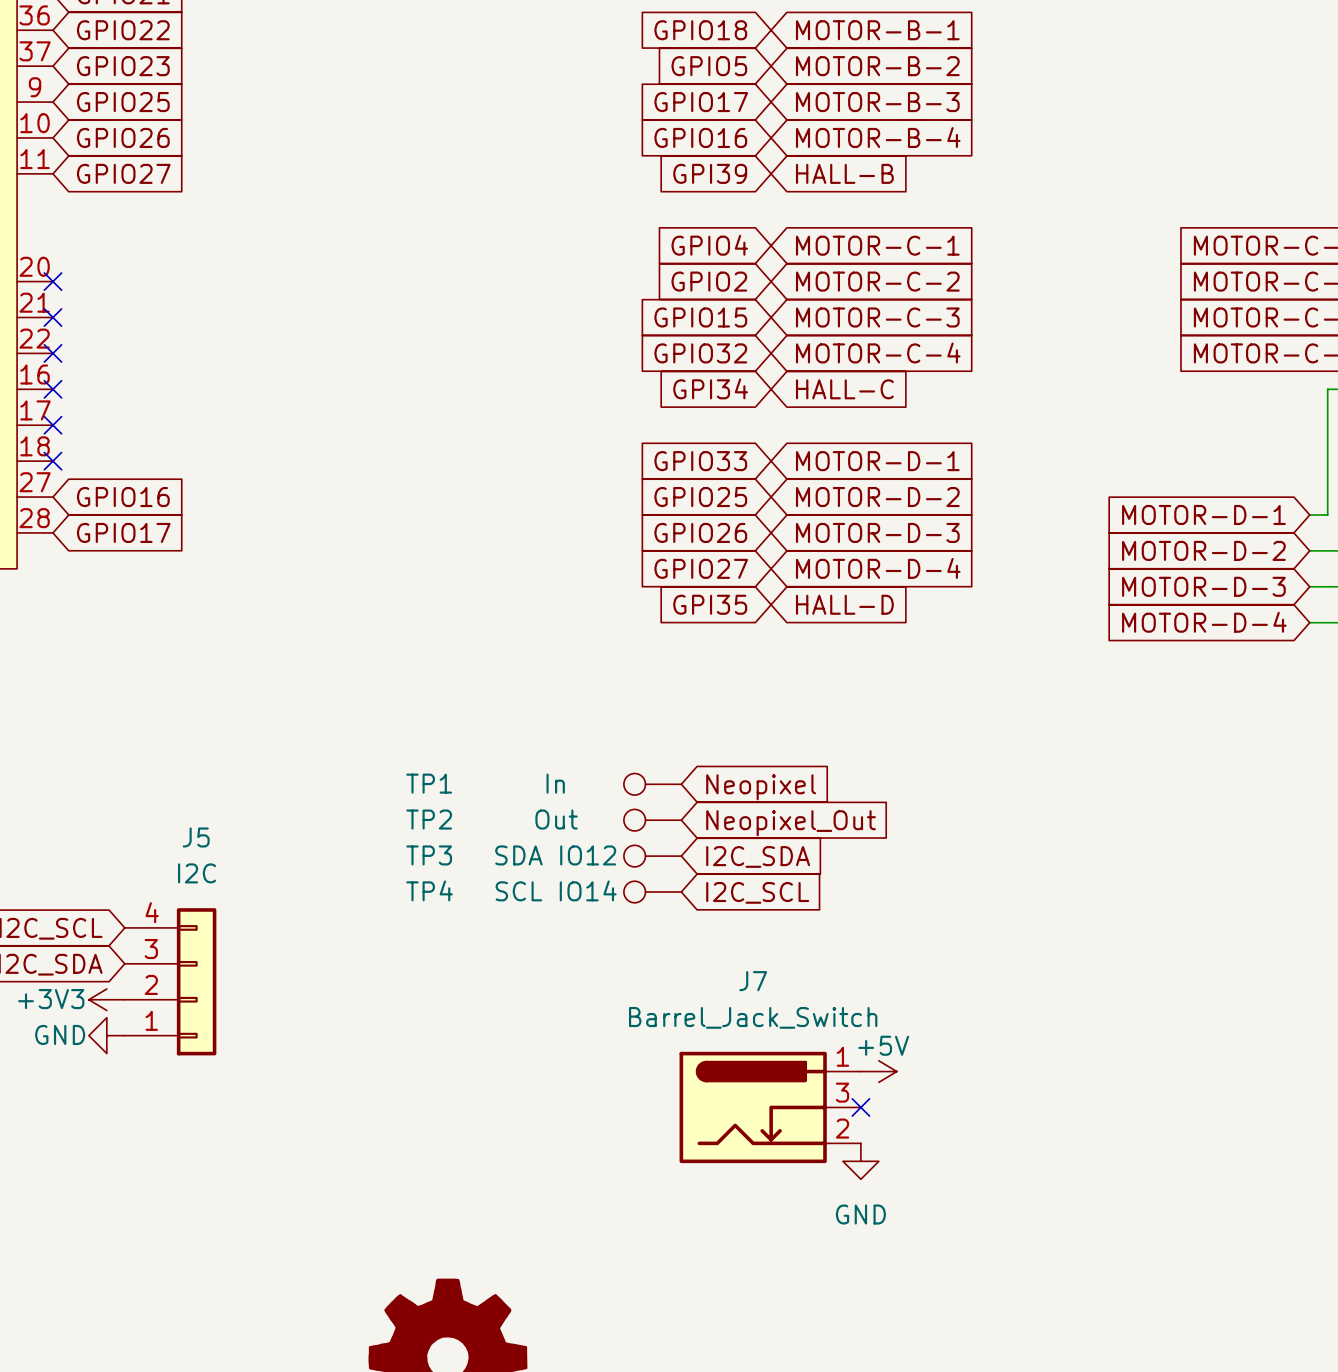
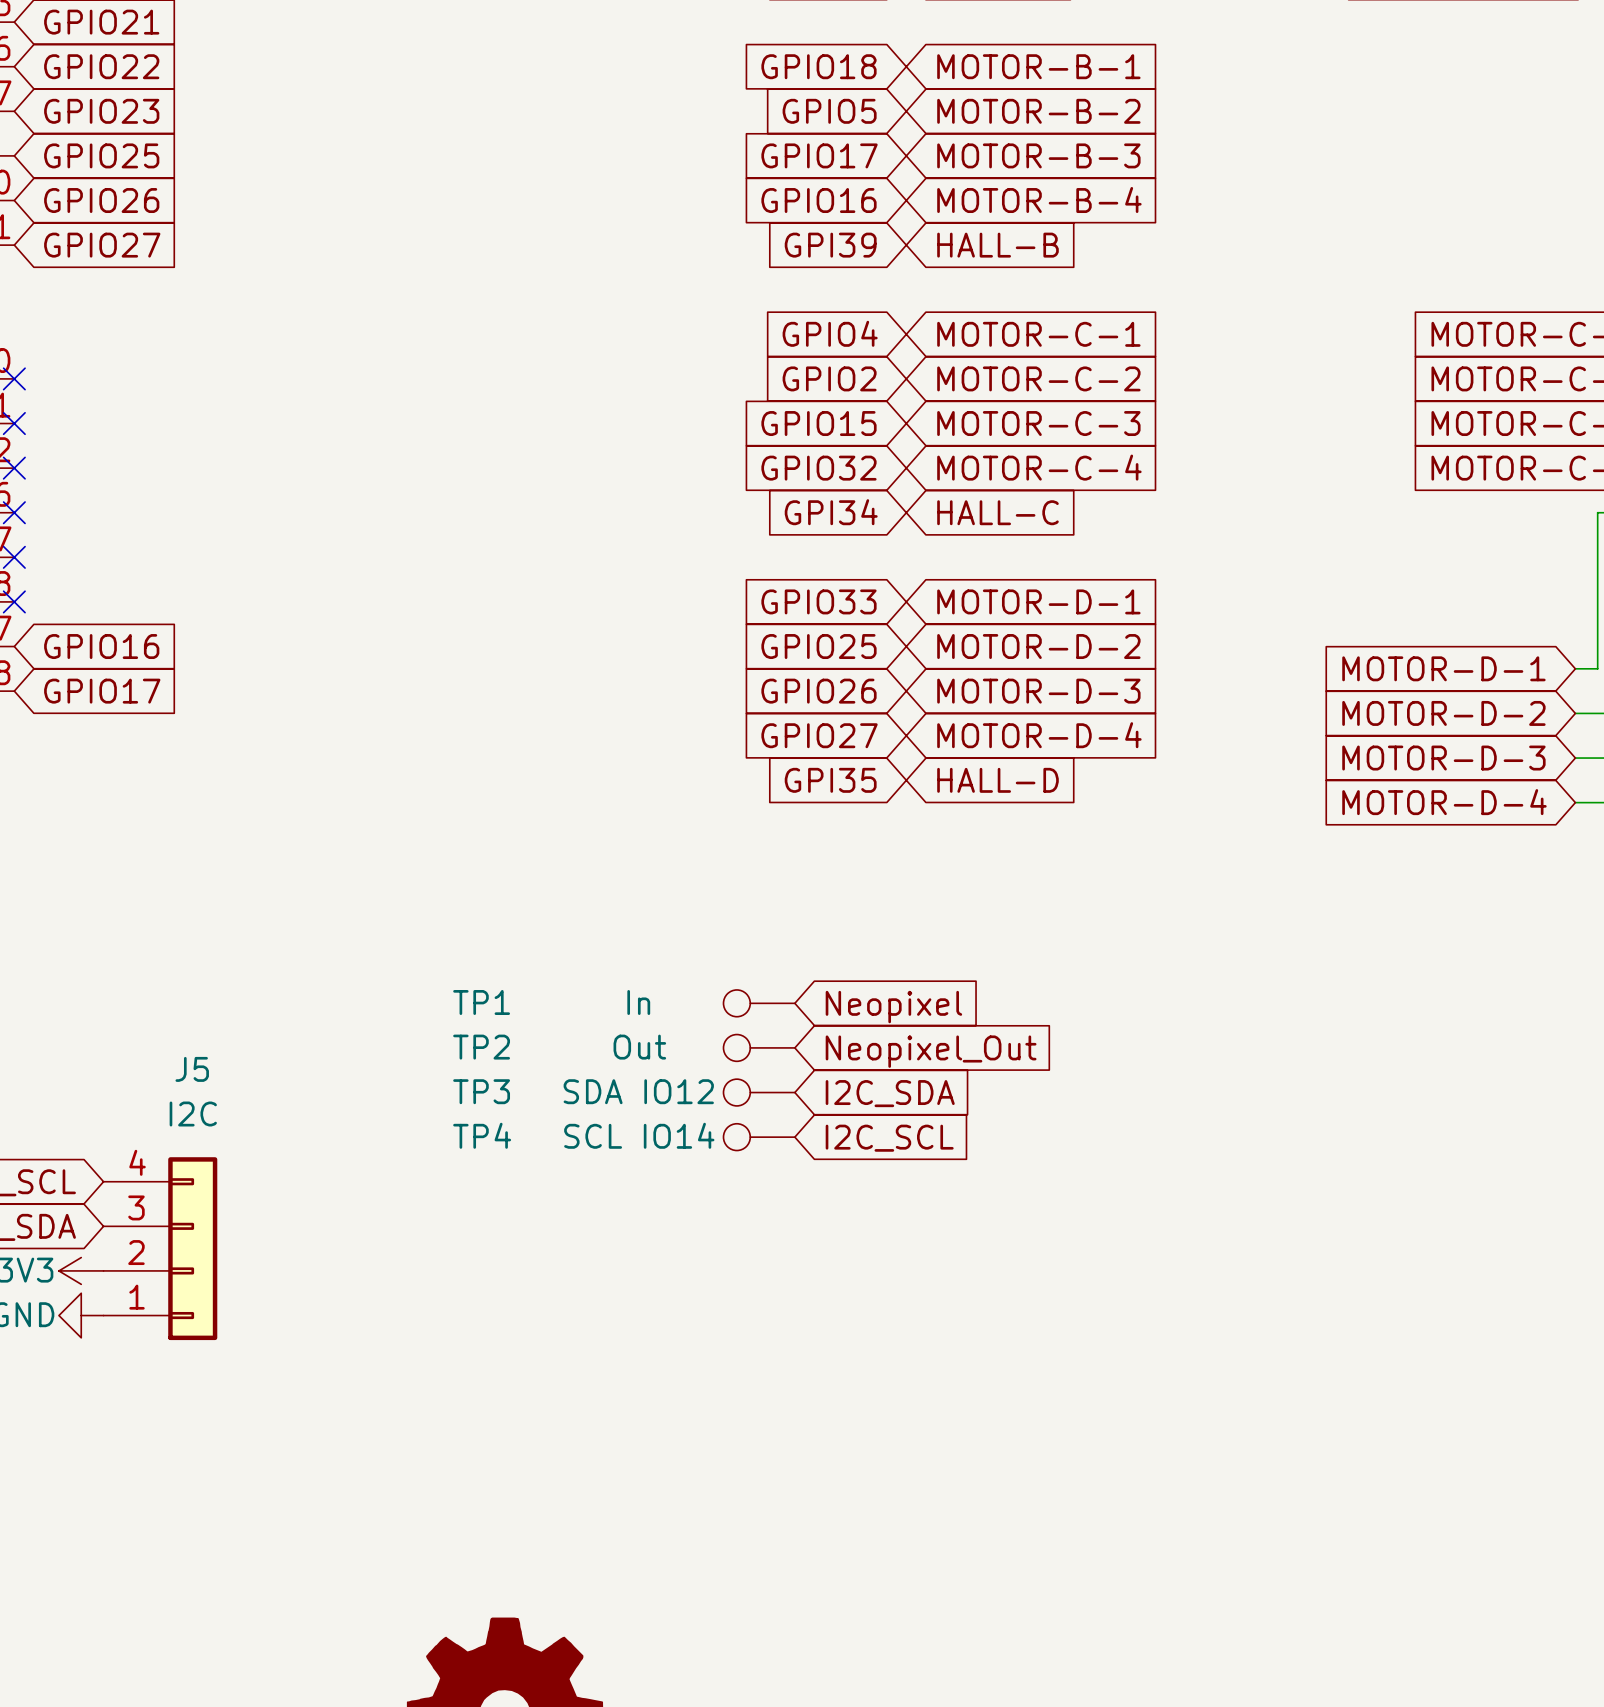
power symbol: +5V (878, 1071) -> none
J7: Barrel_Jack_Switch (770, 1107) -> none
no-connect mark: (860, 1107) -> none
power symbol: GND (860, 1161) -> none

